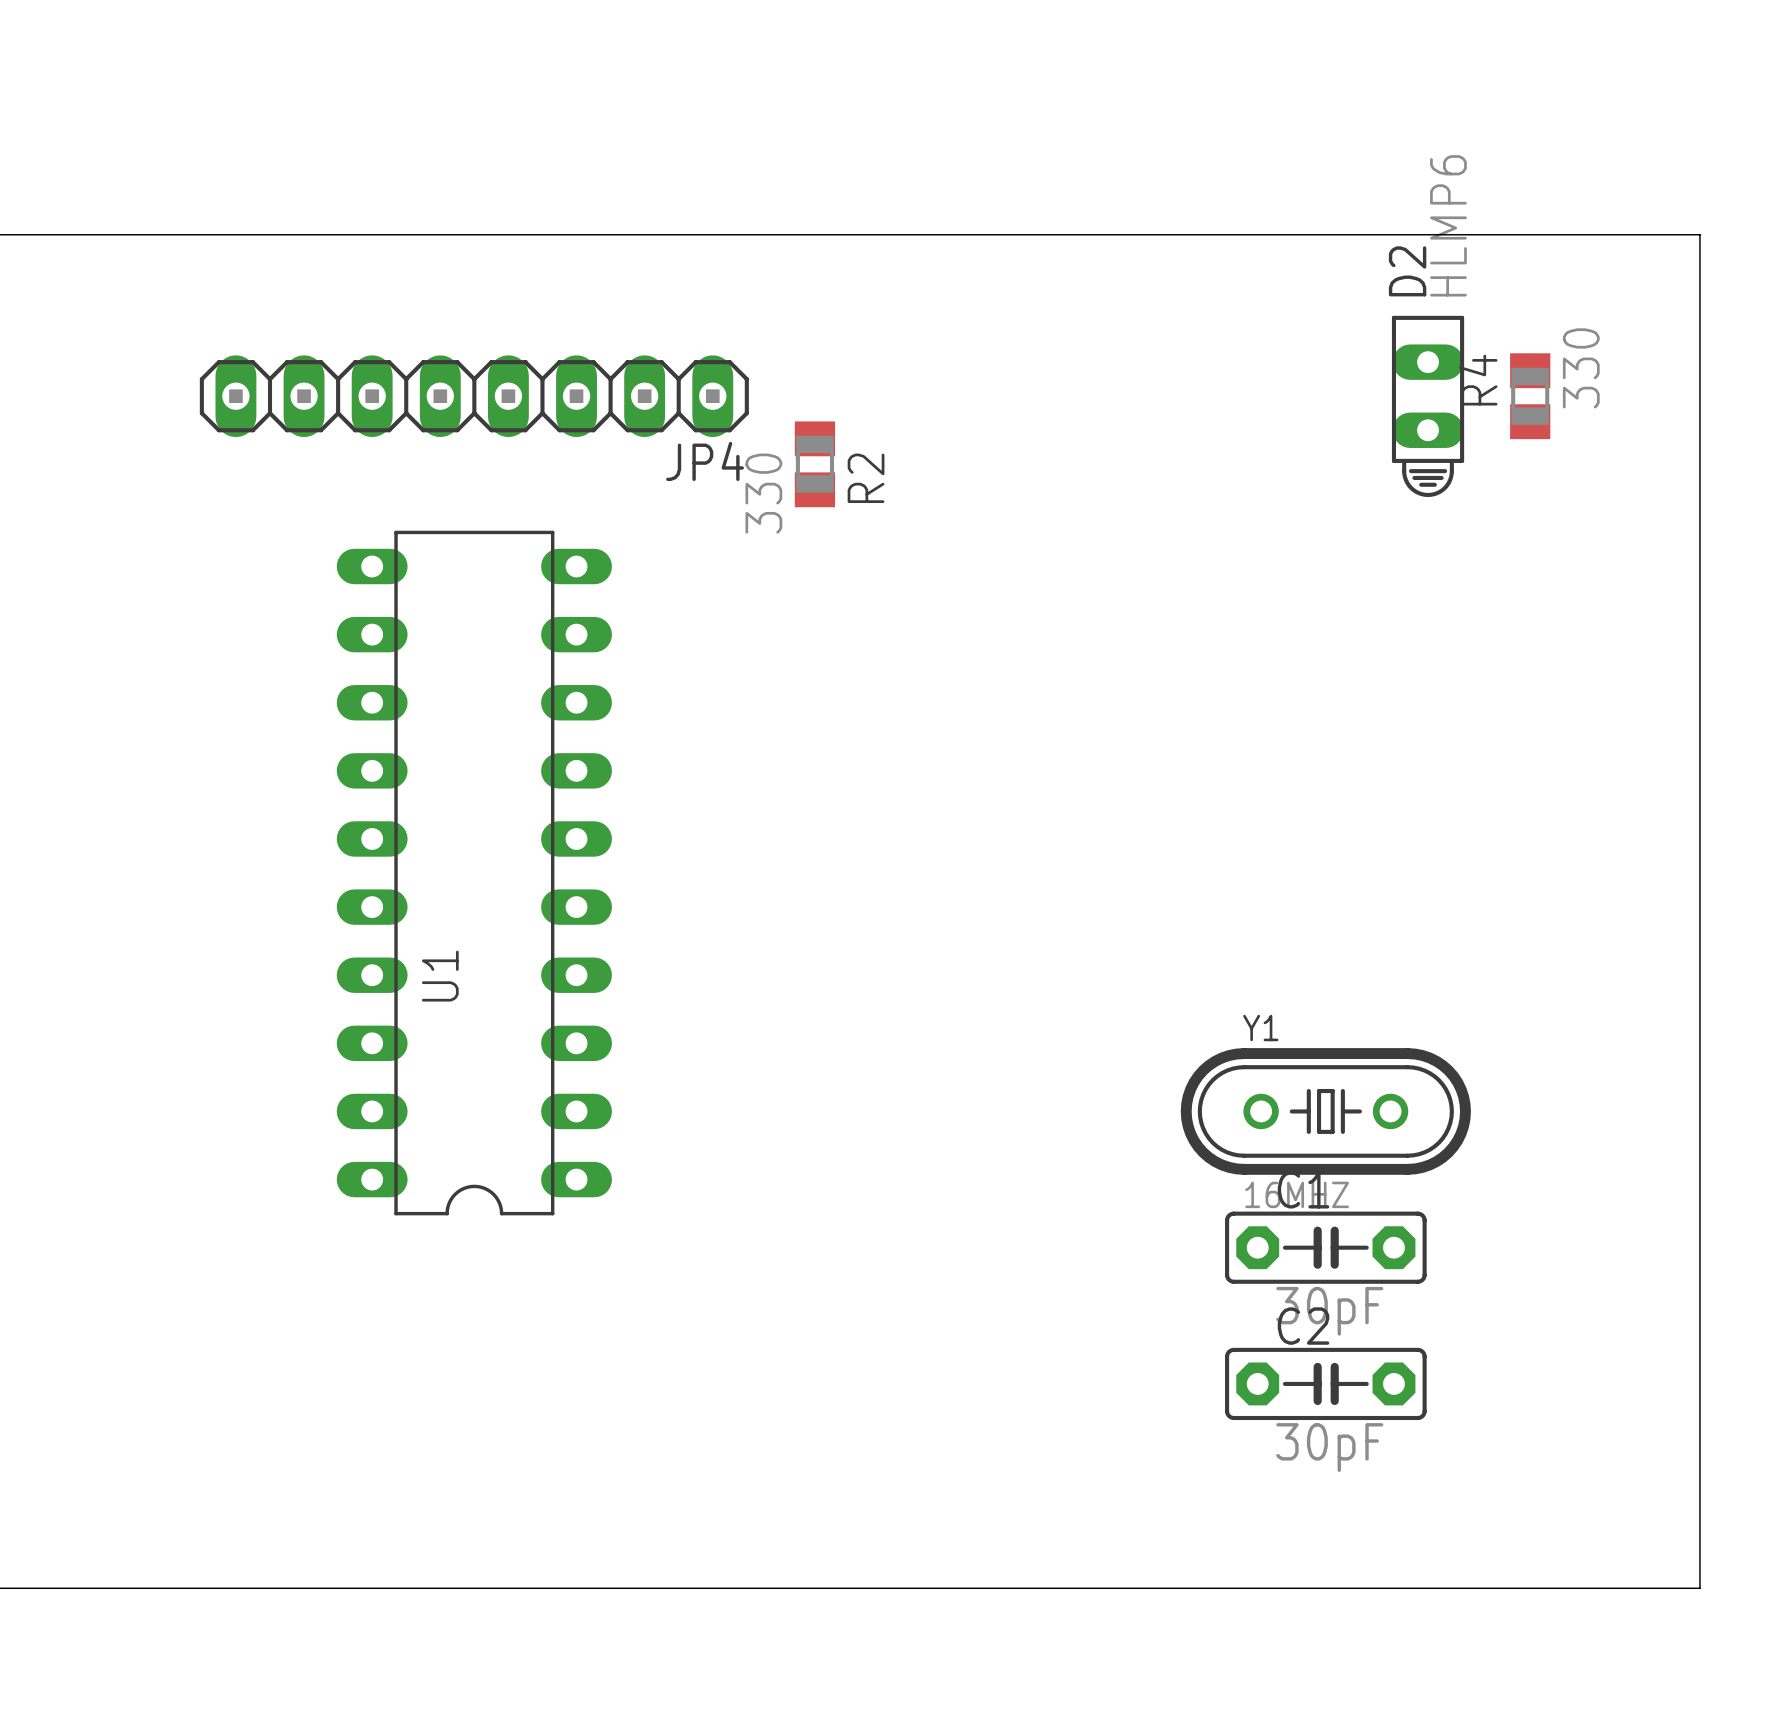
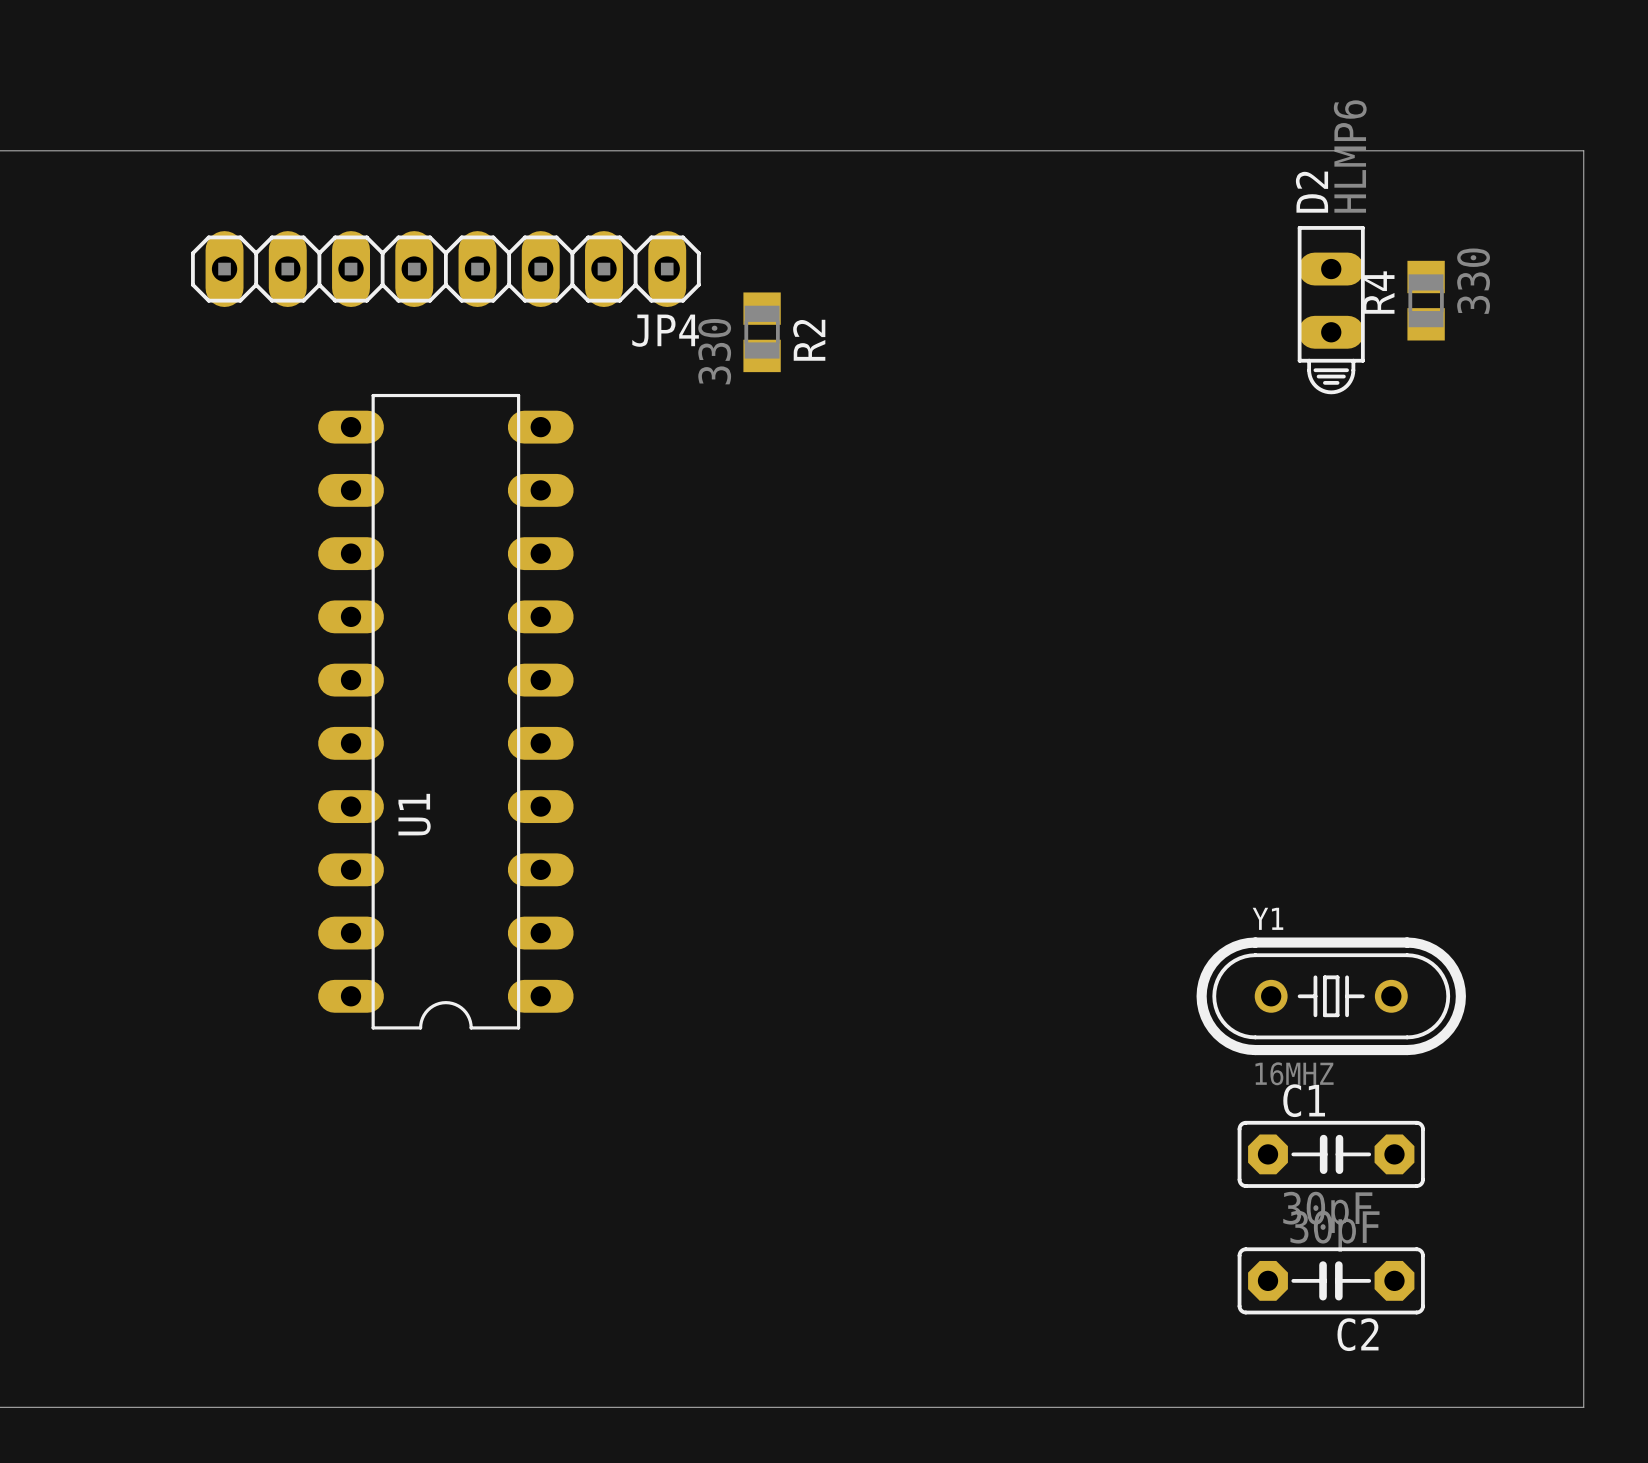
JP4 position: (474, 396) -> (445, 269)
R2 position: (814, 464) -> (762, 332)
U1 position: (474, 873) -> (445, 711)
Y1 position: (1325, 1111) -> (1331, 996)
C1 position: (1325, 1247) -> (1331, 1154)
C2 rotation: 0° (1325, 1383) -> 180° (1331, 1280)
C2 position: (1325, 1383) -> (1331, 1280)

